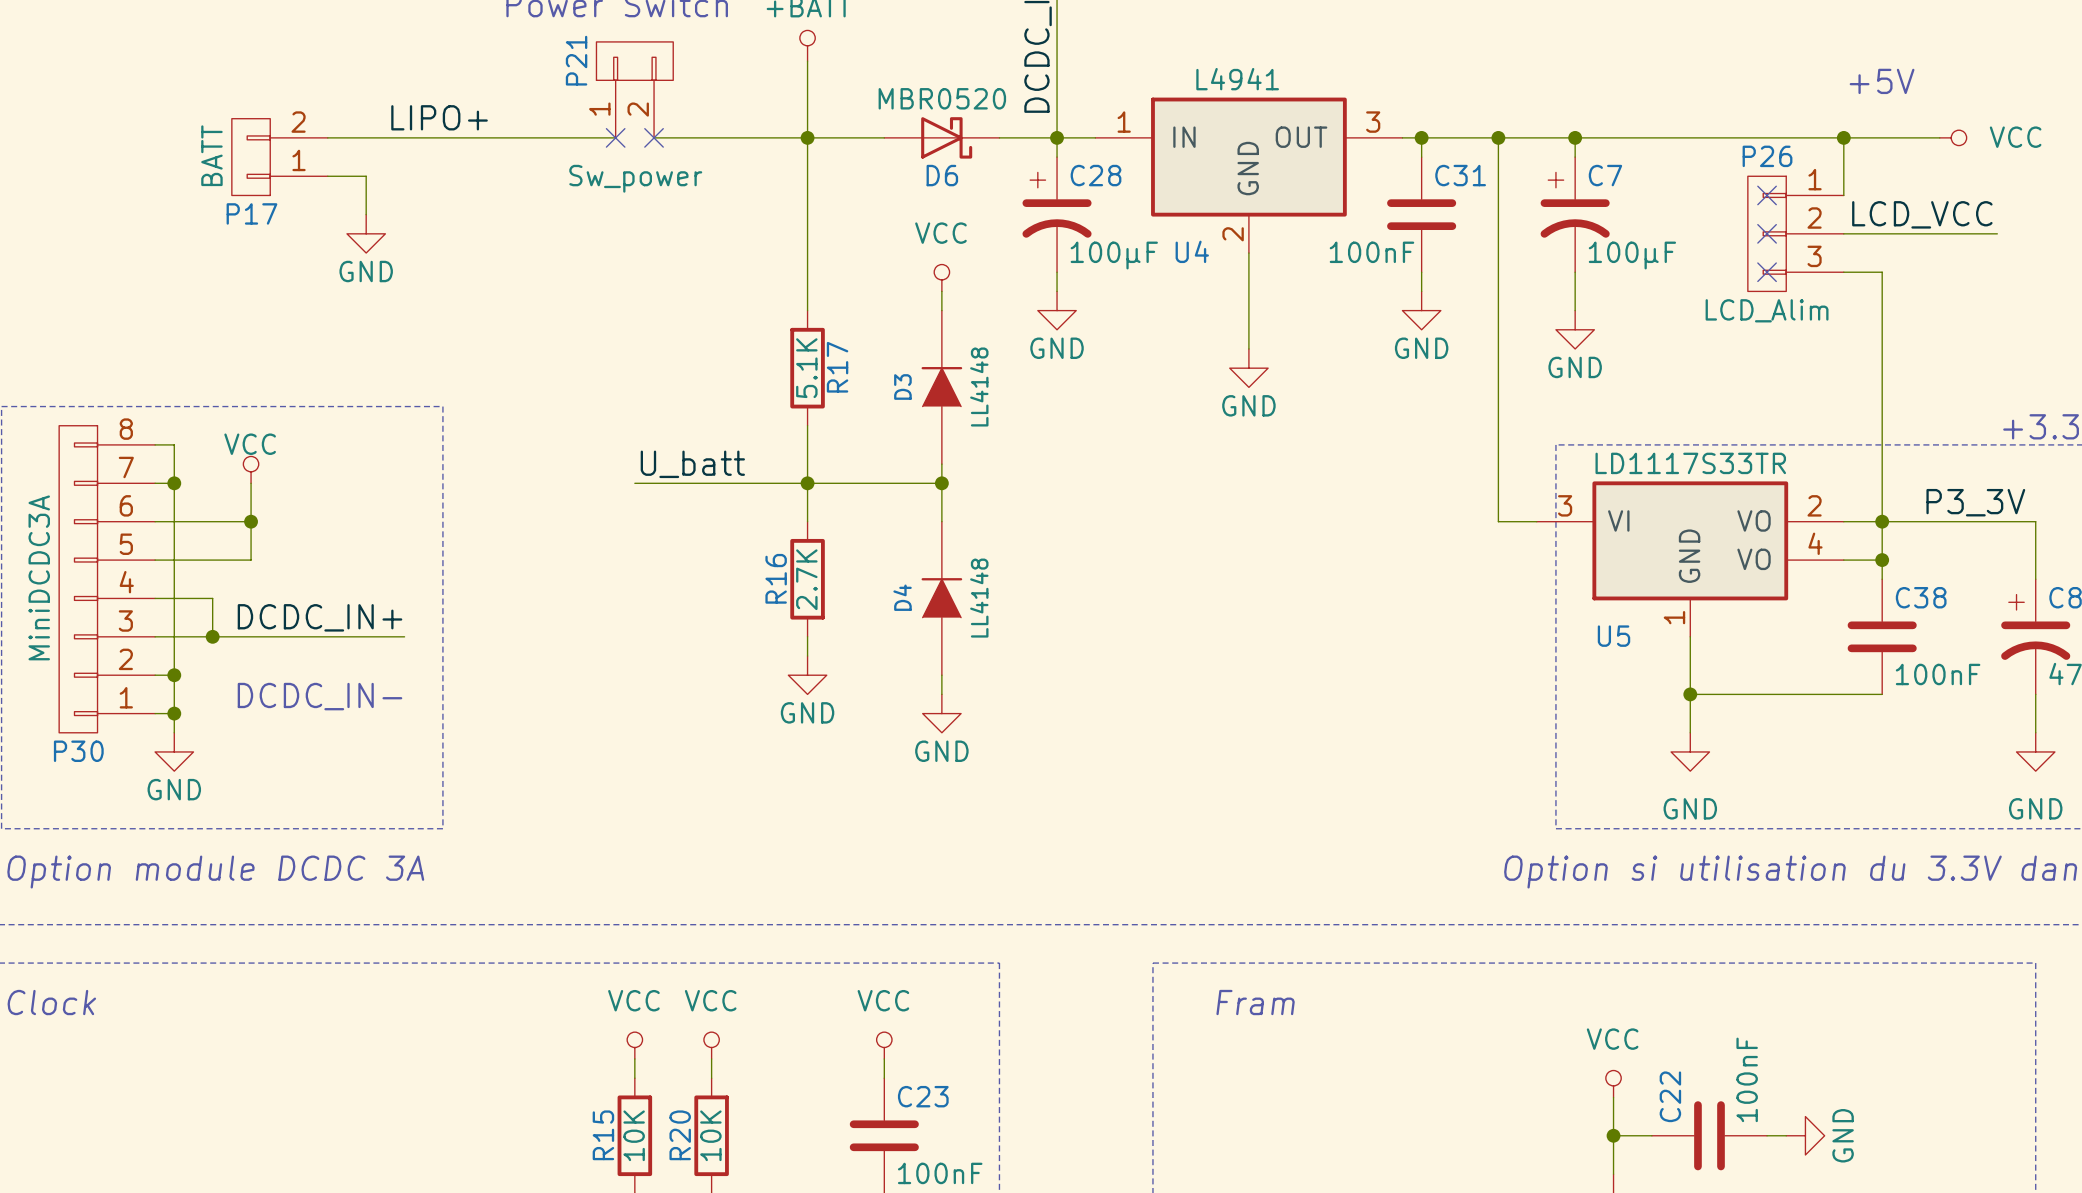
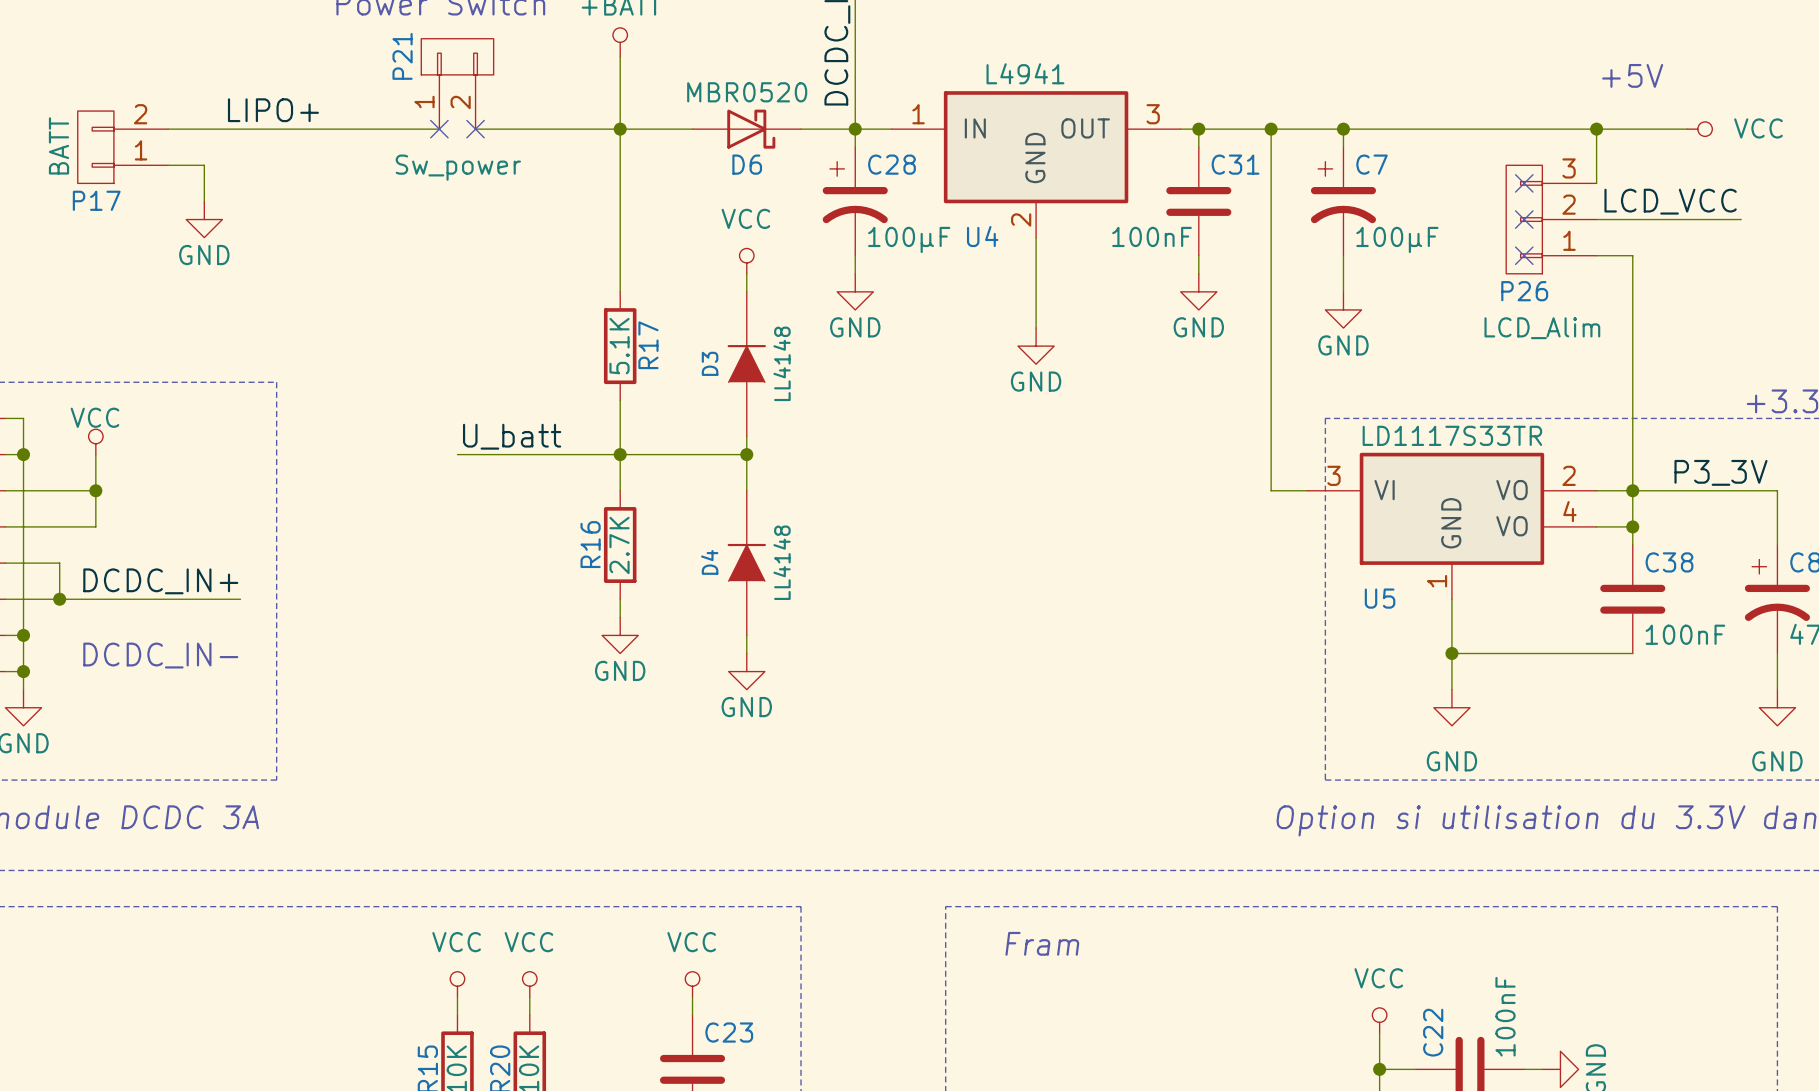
P26 flip: as is (1767, 233) -> up-down (1524, 219)
P26 value position: LCD_Alim (1767, 310) -> LCD_Alim (1542, 328)

